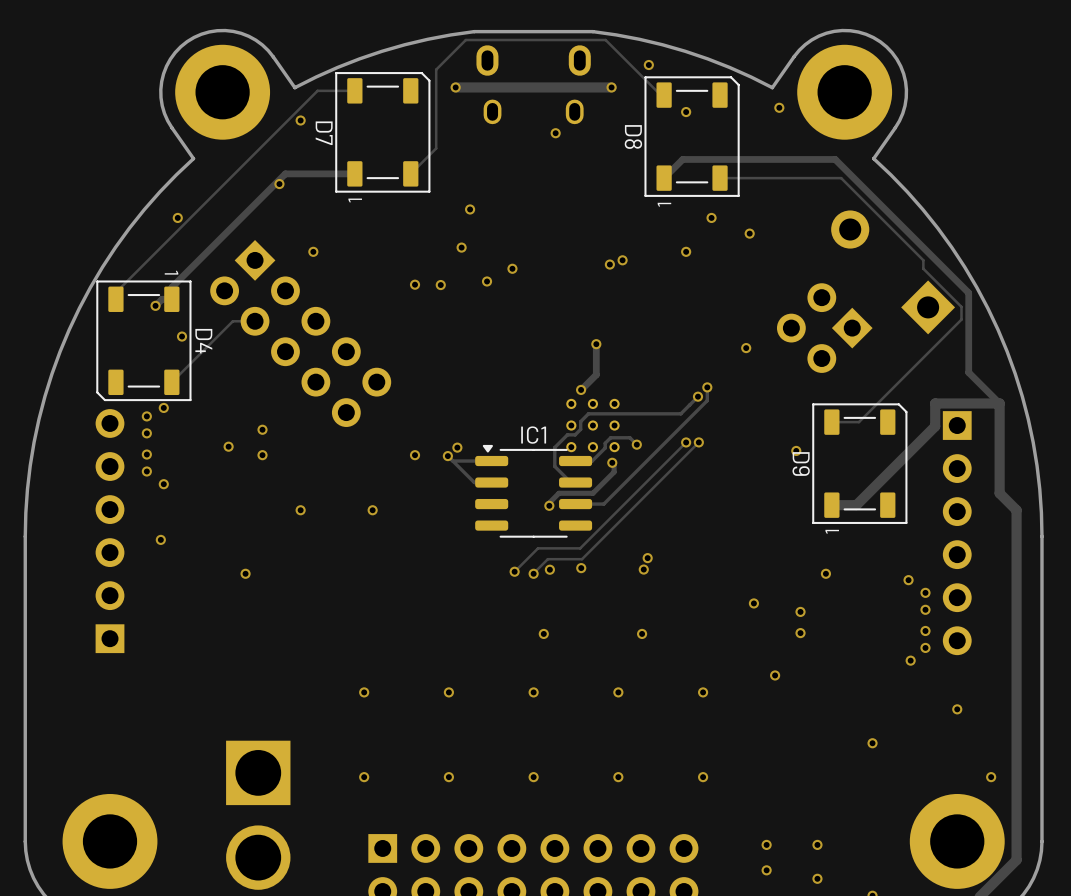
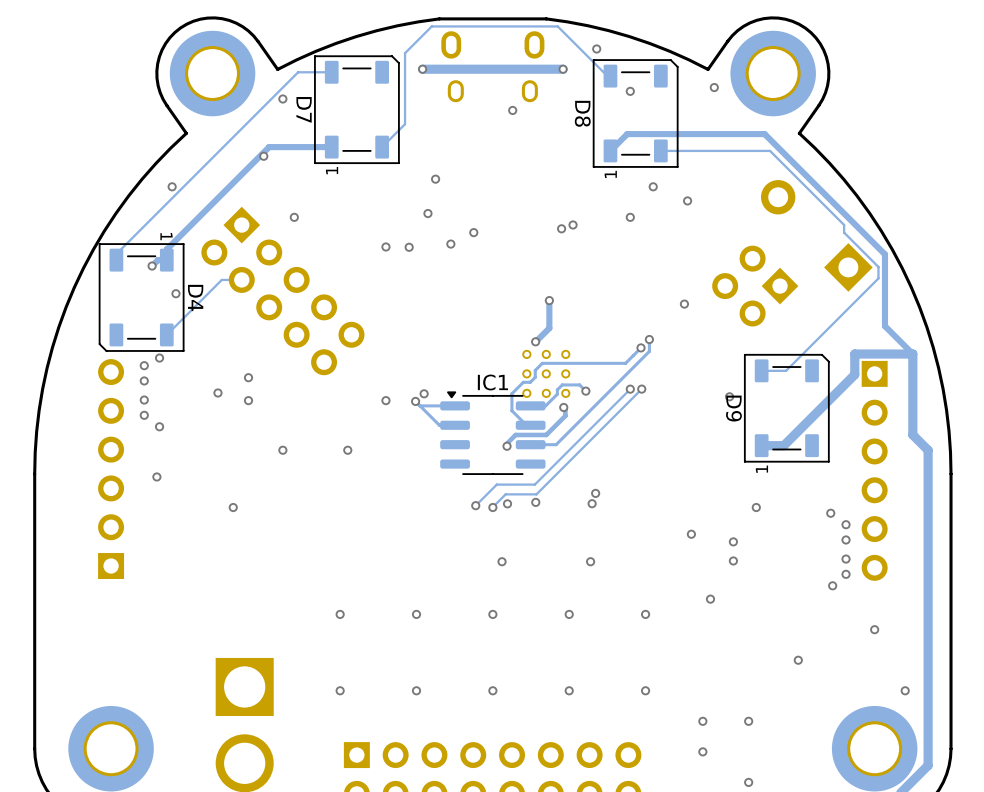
via: none -> (702, 721)
via: none -> (748, 721)
via: (817, 844) -> none
via: (766, 870) -> none

